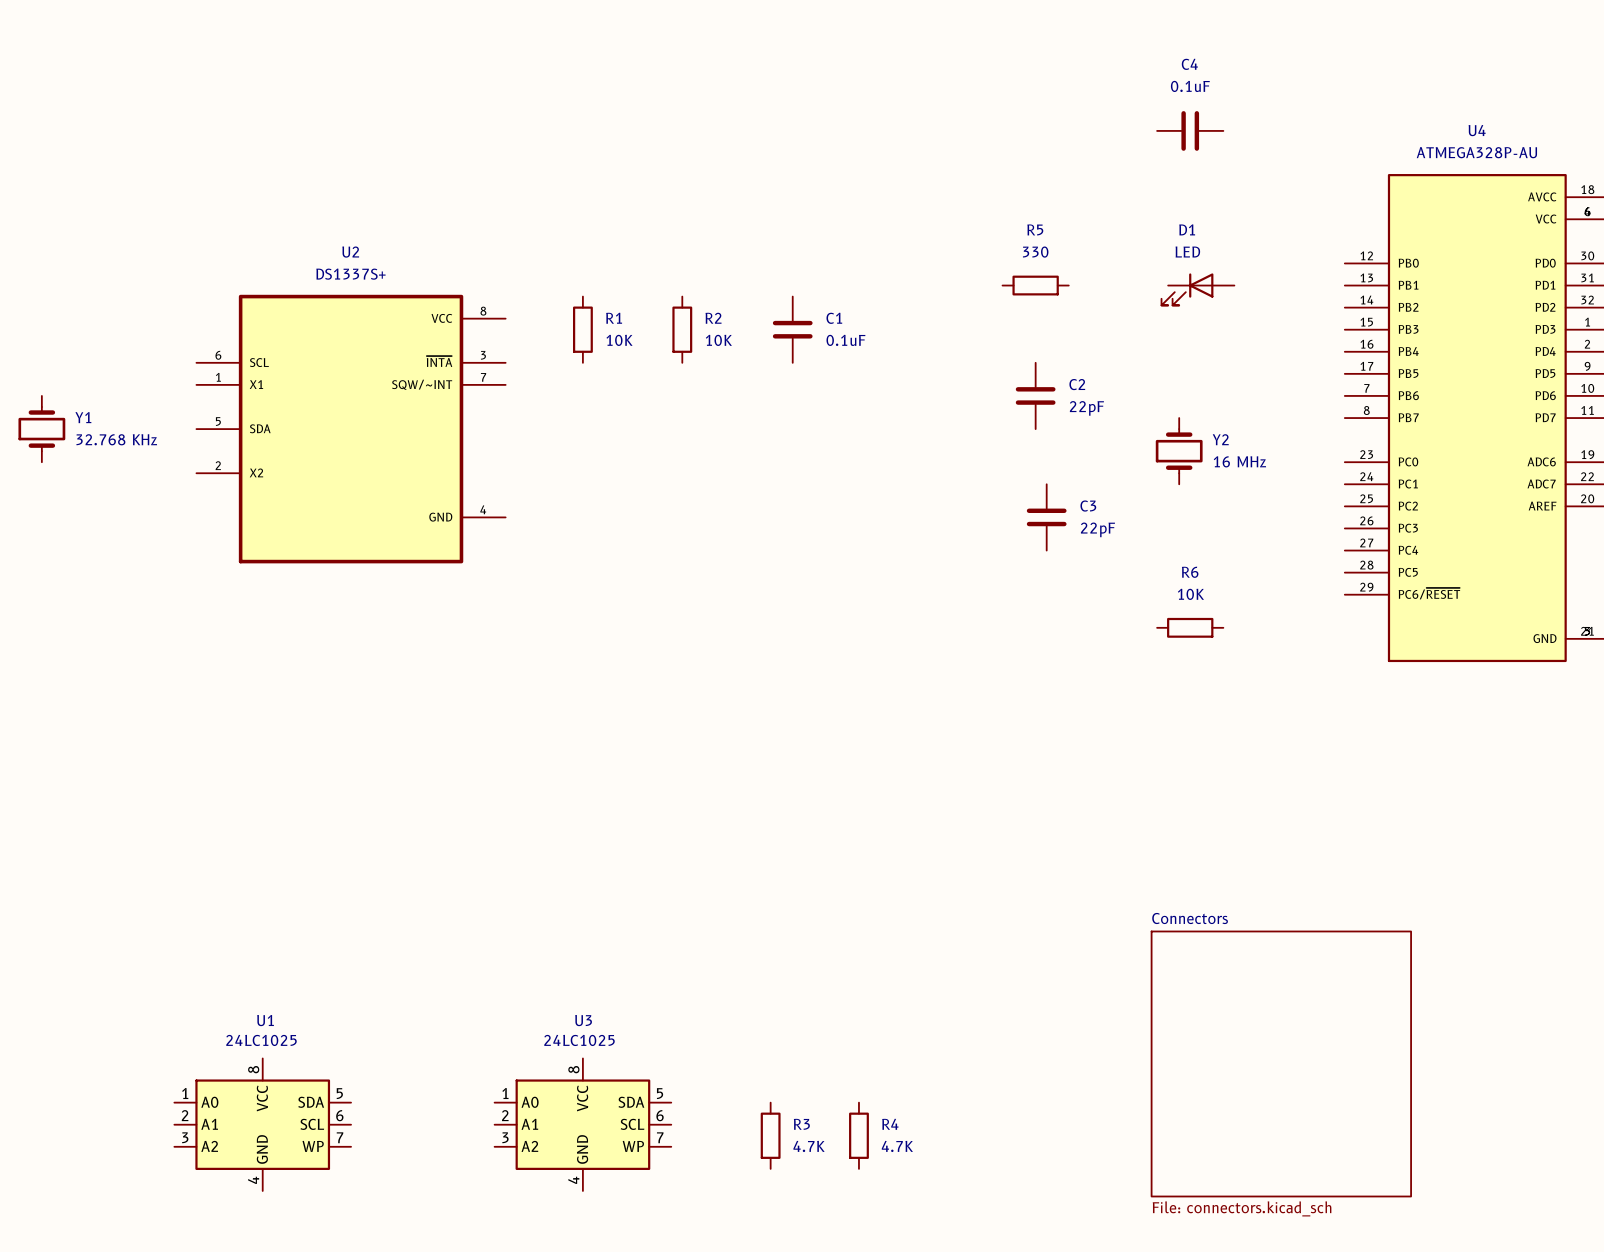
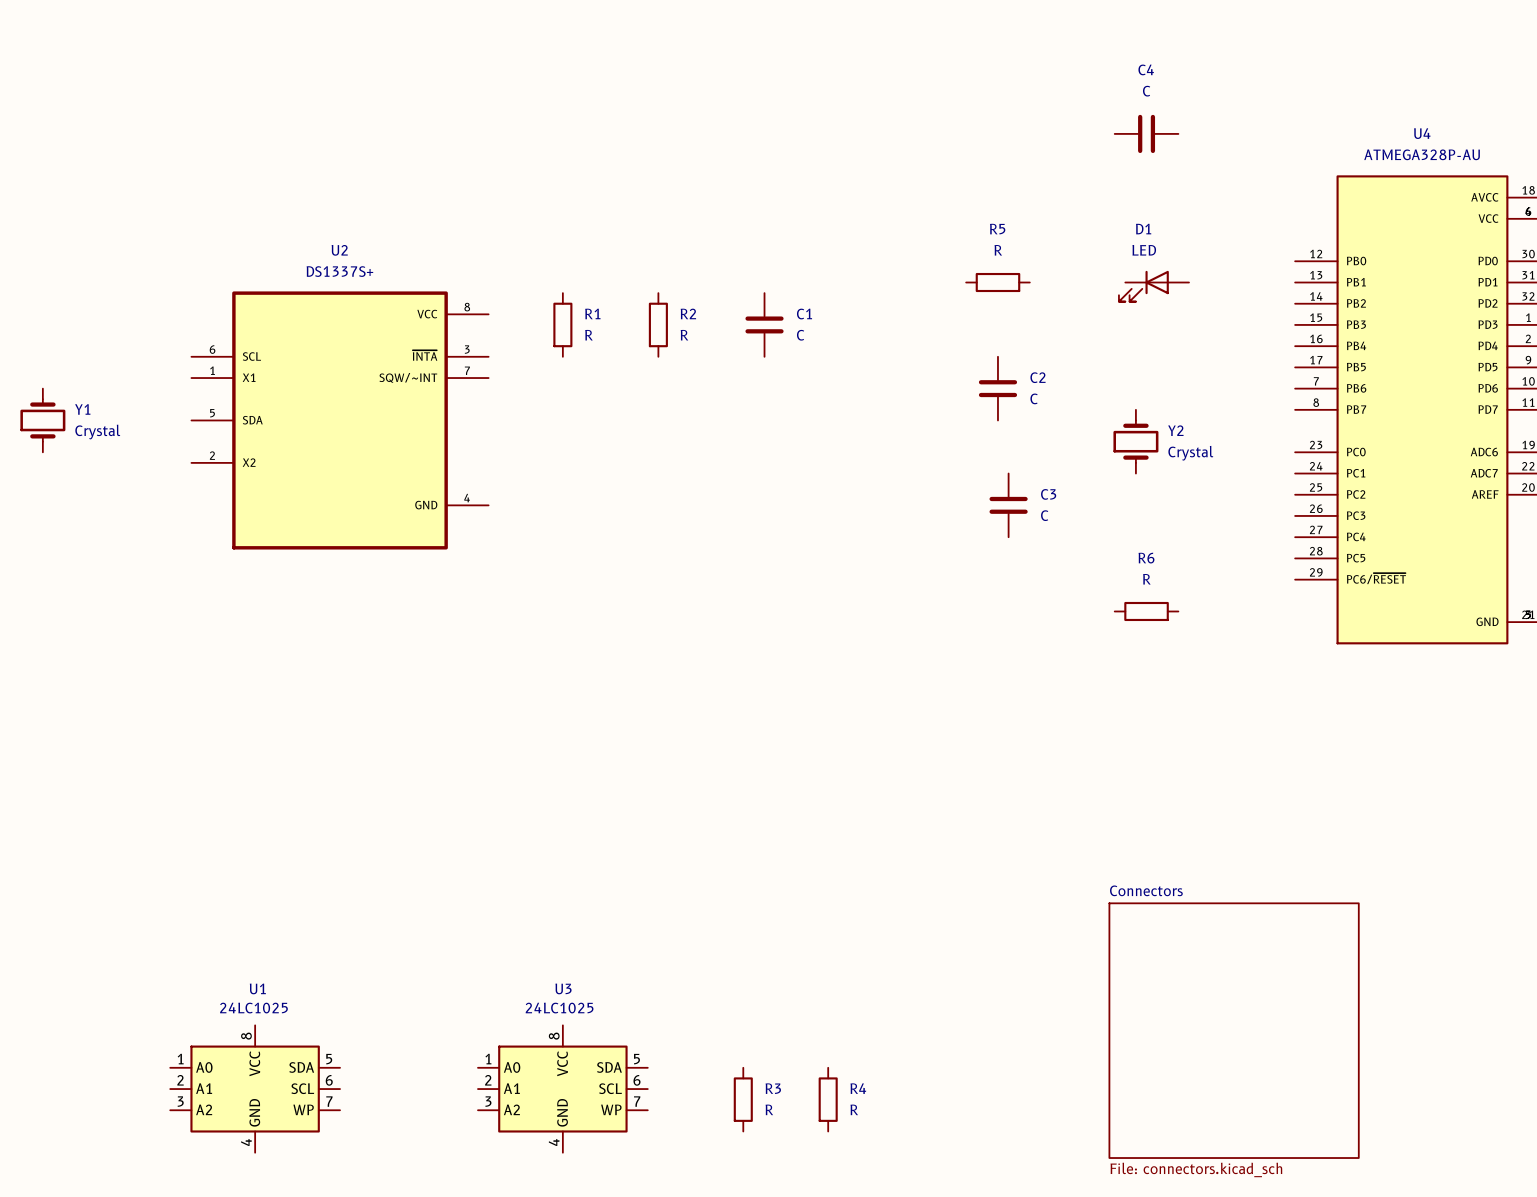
C4 value: 0.1uF (1190, 86) -> C (1146, 91)
R5 value: 330 (1035, 252) -> R (998, 250)
R1 value: 10K (619, 340) -> R (588, 335)
R2 value: 10K (718, 340) -> R (684, 335)
C1 value: 0.1uF (845, 340) -> C (800, 335)
C2 value: 22pF (1086, 408) -> C (1034, 398)
Y1 value: 32.768 KHz (116, 439) -> Crystal (97, 432)
Y2 value: 16 MHz (1239, 461) -> Crystal (1190, 453)
C3 value: 22pF (1097, 529) -> C (1044, 515)
R6 value: 10K (1190, 594) -> R (1146, 579)
R3 value: 4.7K (809, 1146) -> R (769, 1109)
R4 value: 4.7K (897, 1146) -> R (854, 1109)

